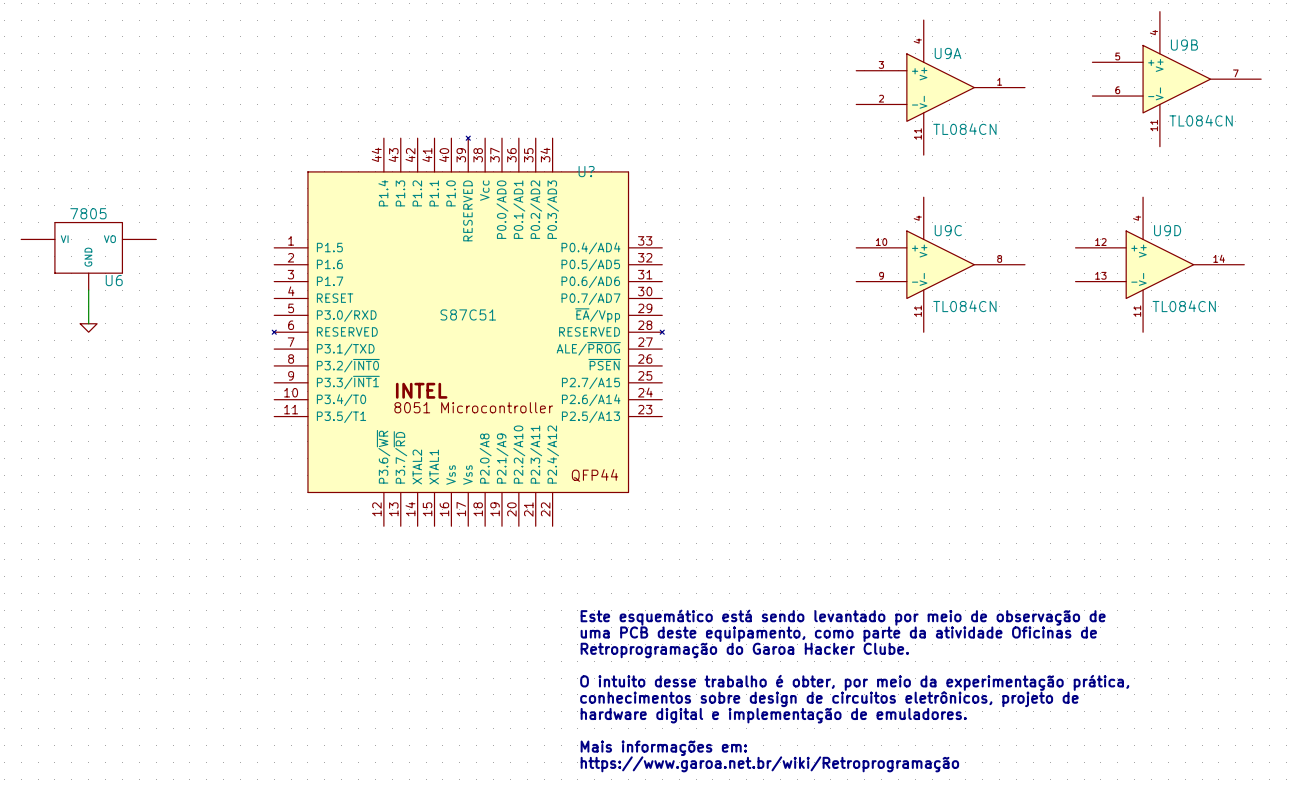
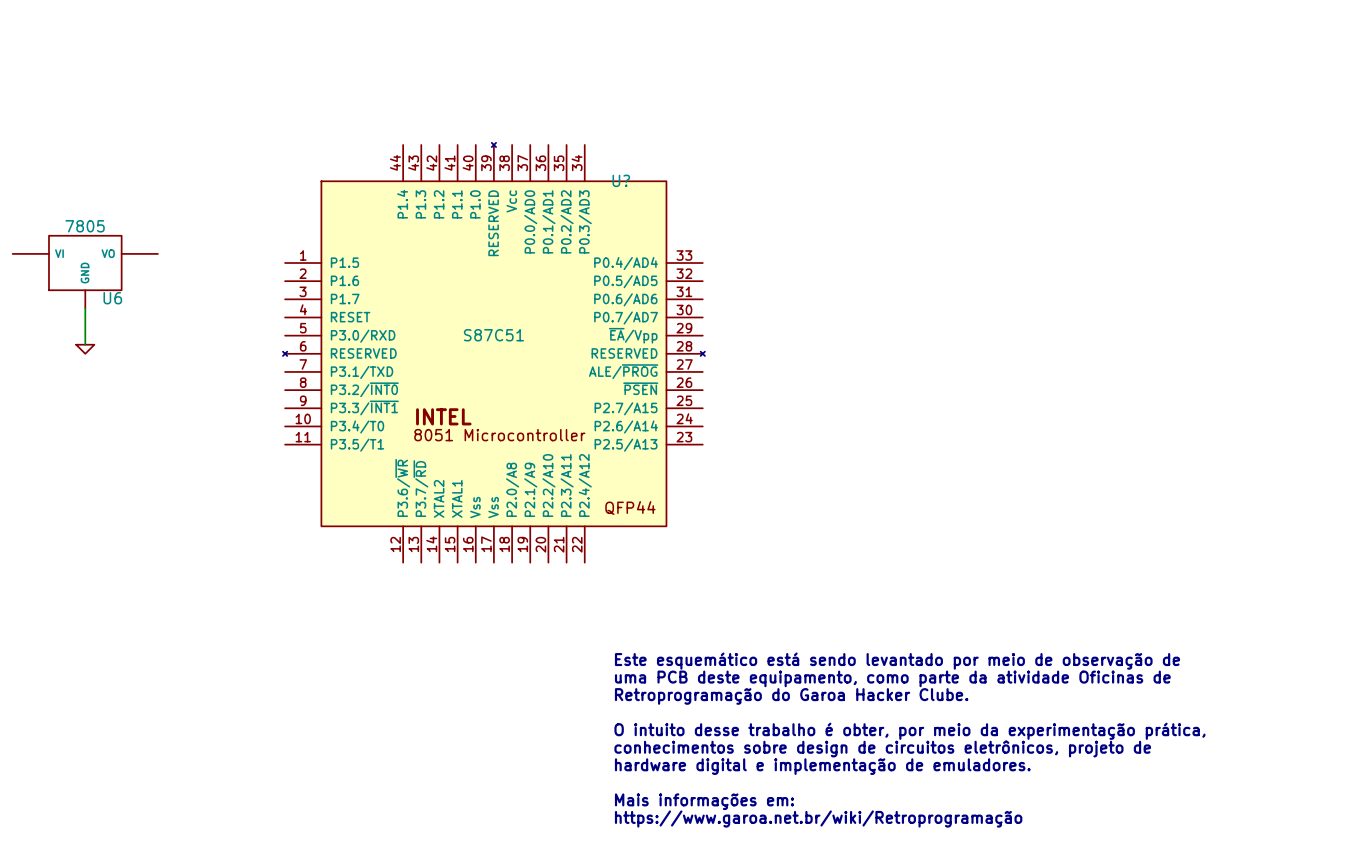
U9B: TL084CN (1176, 79) -> none
U9A: TL084CN (940, 87) -> none
U9C: TL084CN (940, 264) -> none
U9D: TL084CN (1159, 264) -> none

